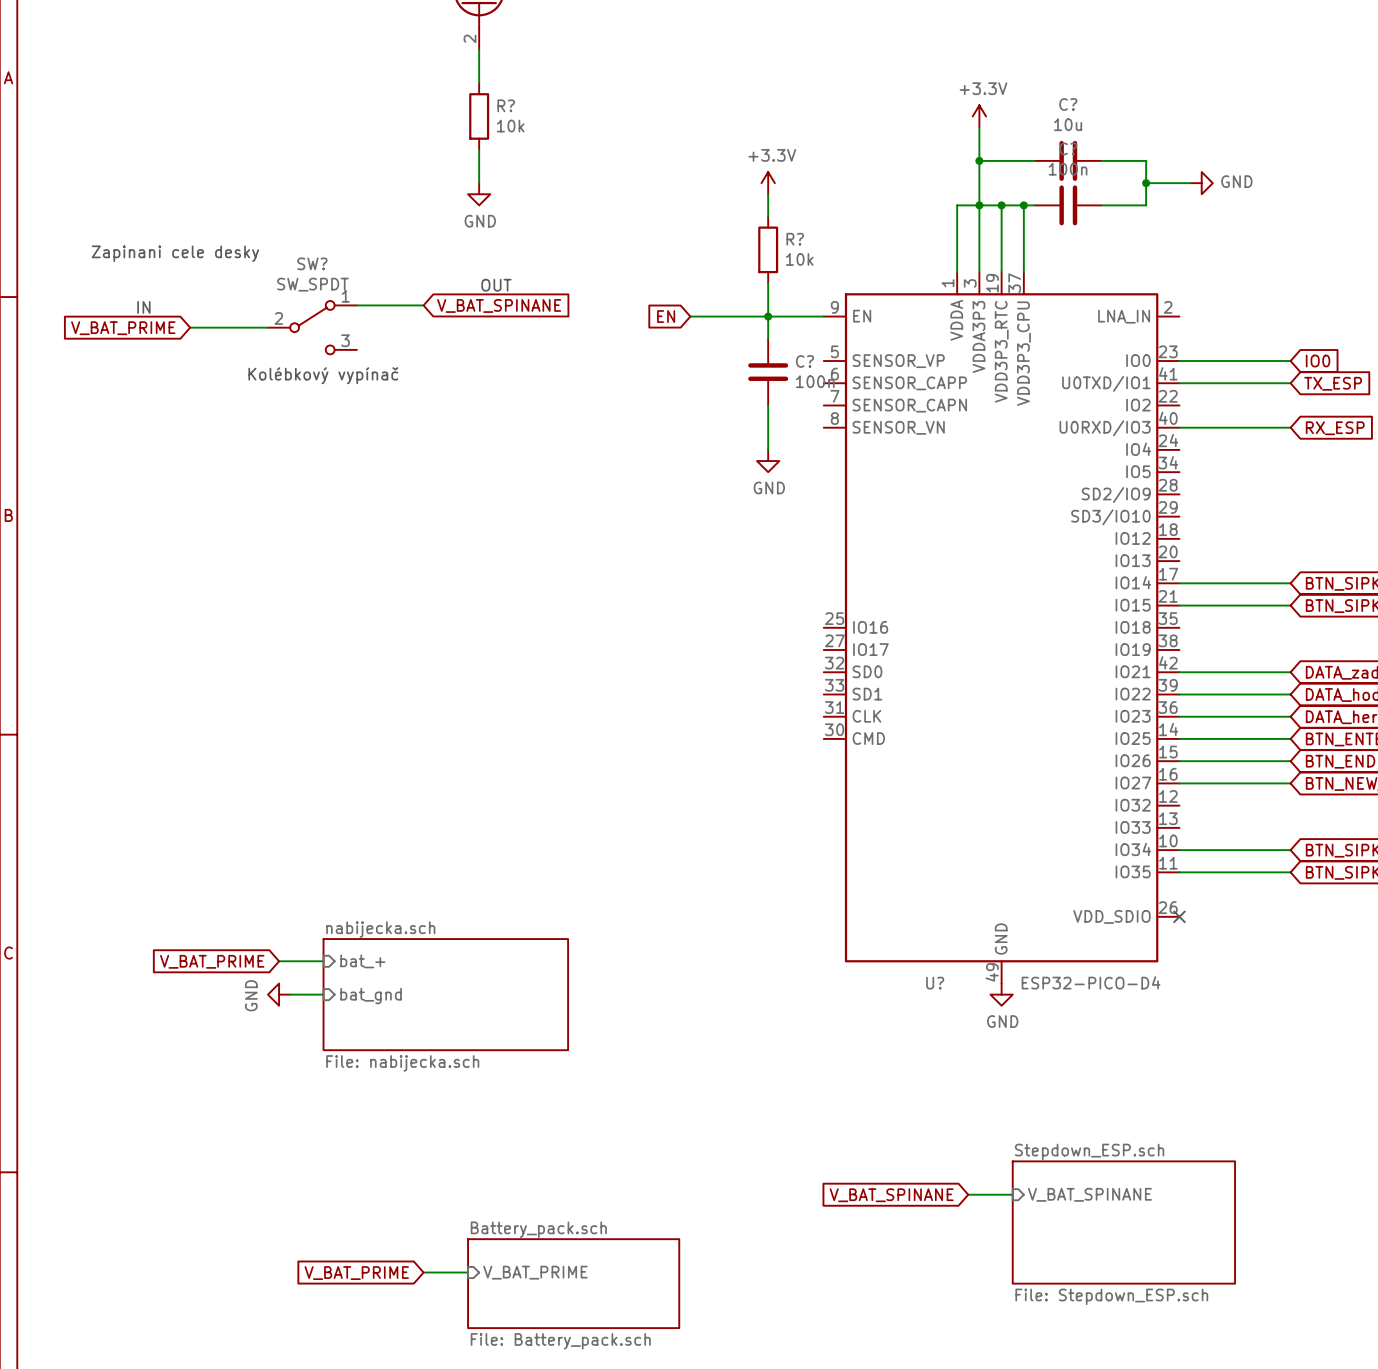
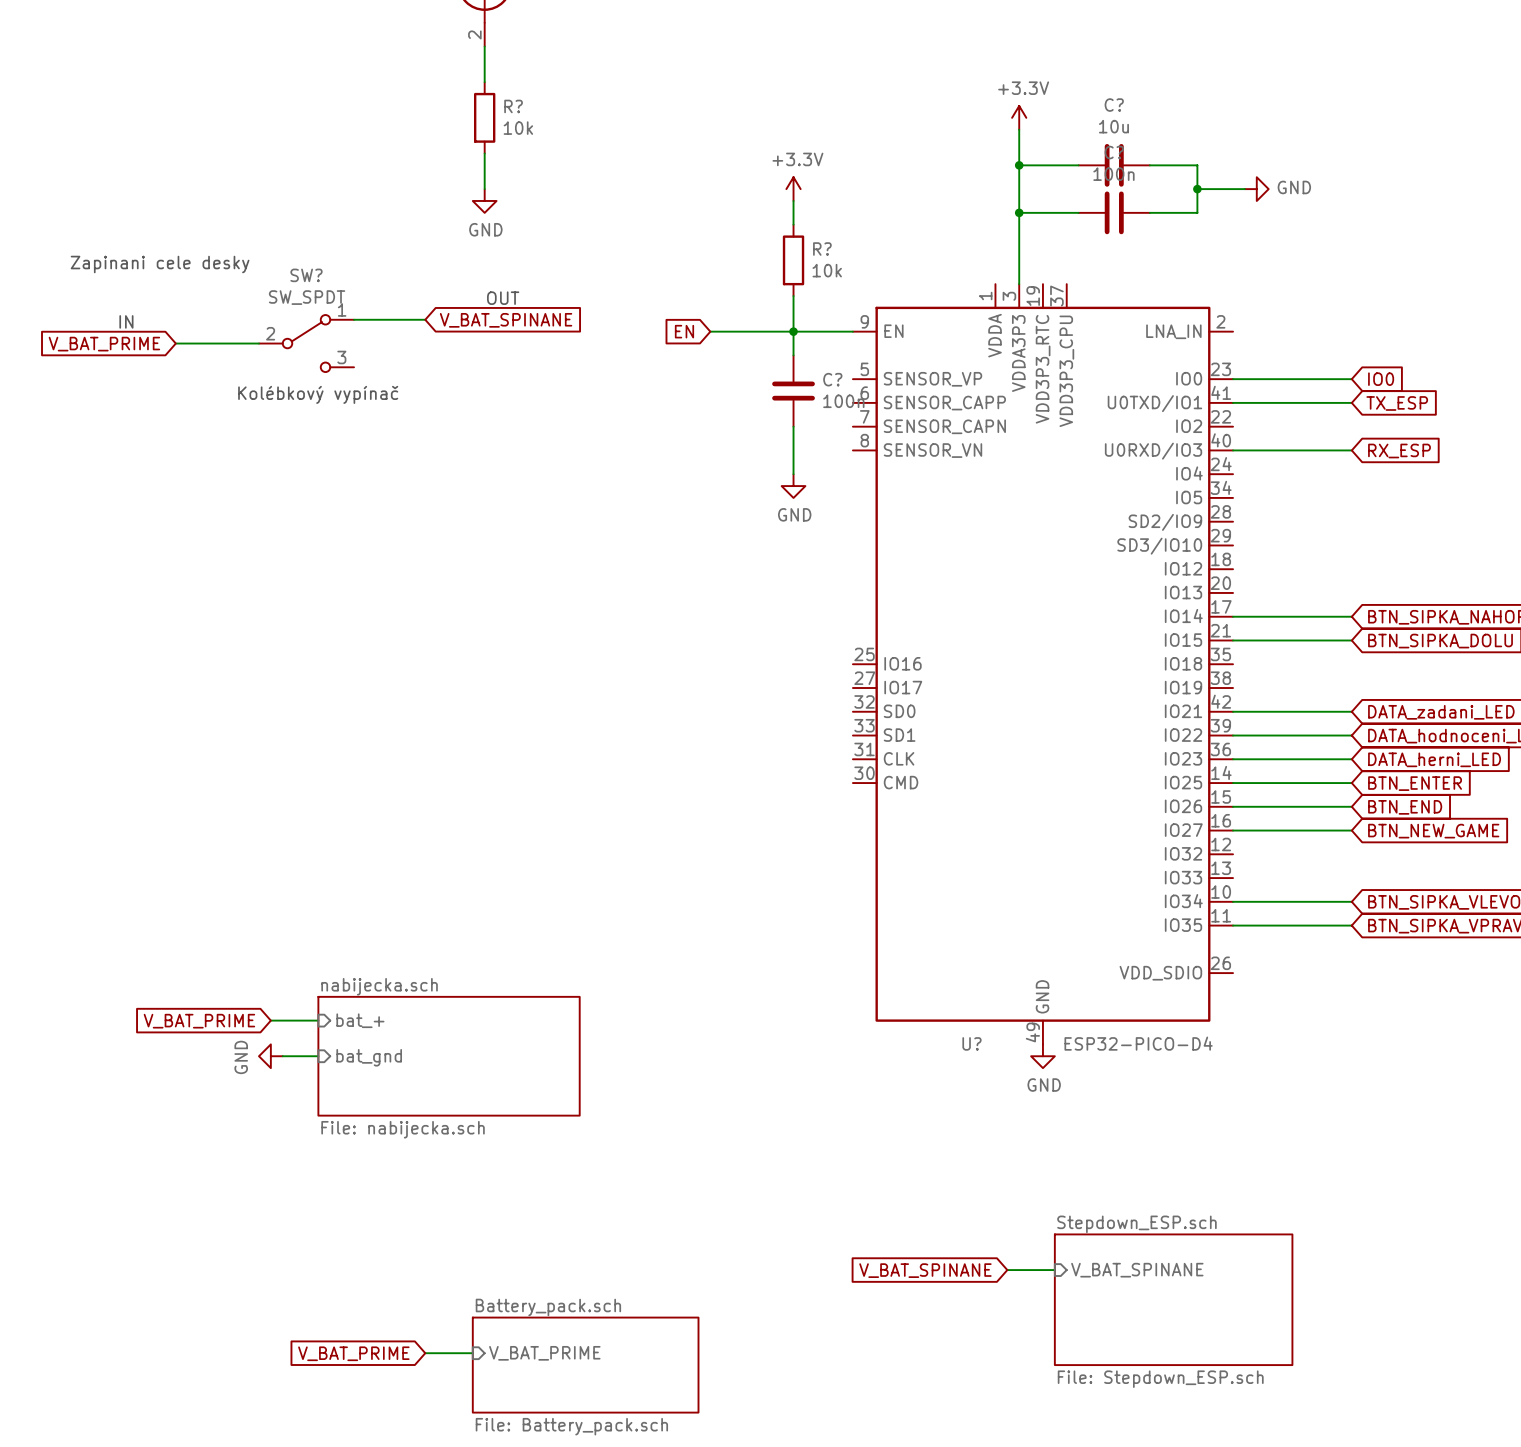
wire: (979, 205) (957, 205) (957, 272) -> none
wire: (1001, 205) (1001, 272) -> none
junction: (1001, 205) -> none
wire: (1023, 205) (1023, 272) -> none
junction: (1023, 205) -> none
no-connect mark: (1179, 916) -> none

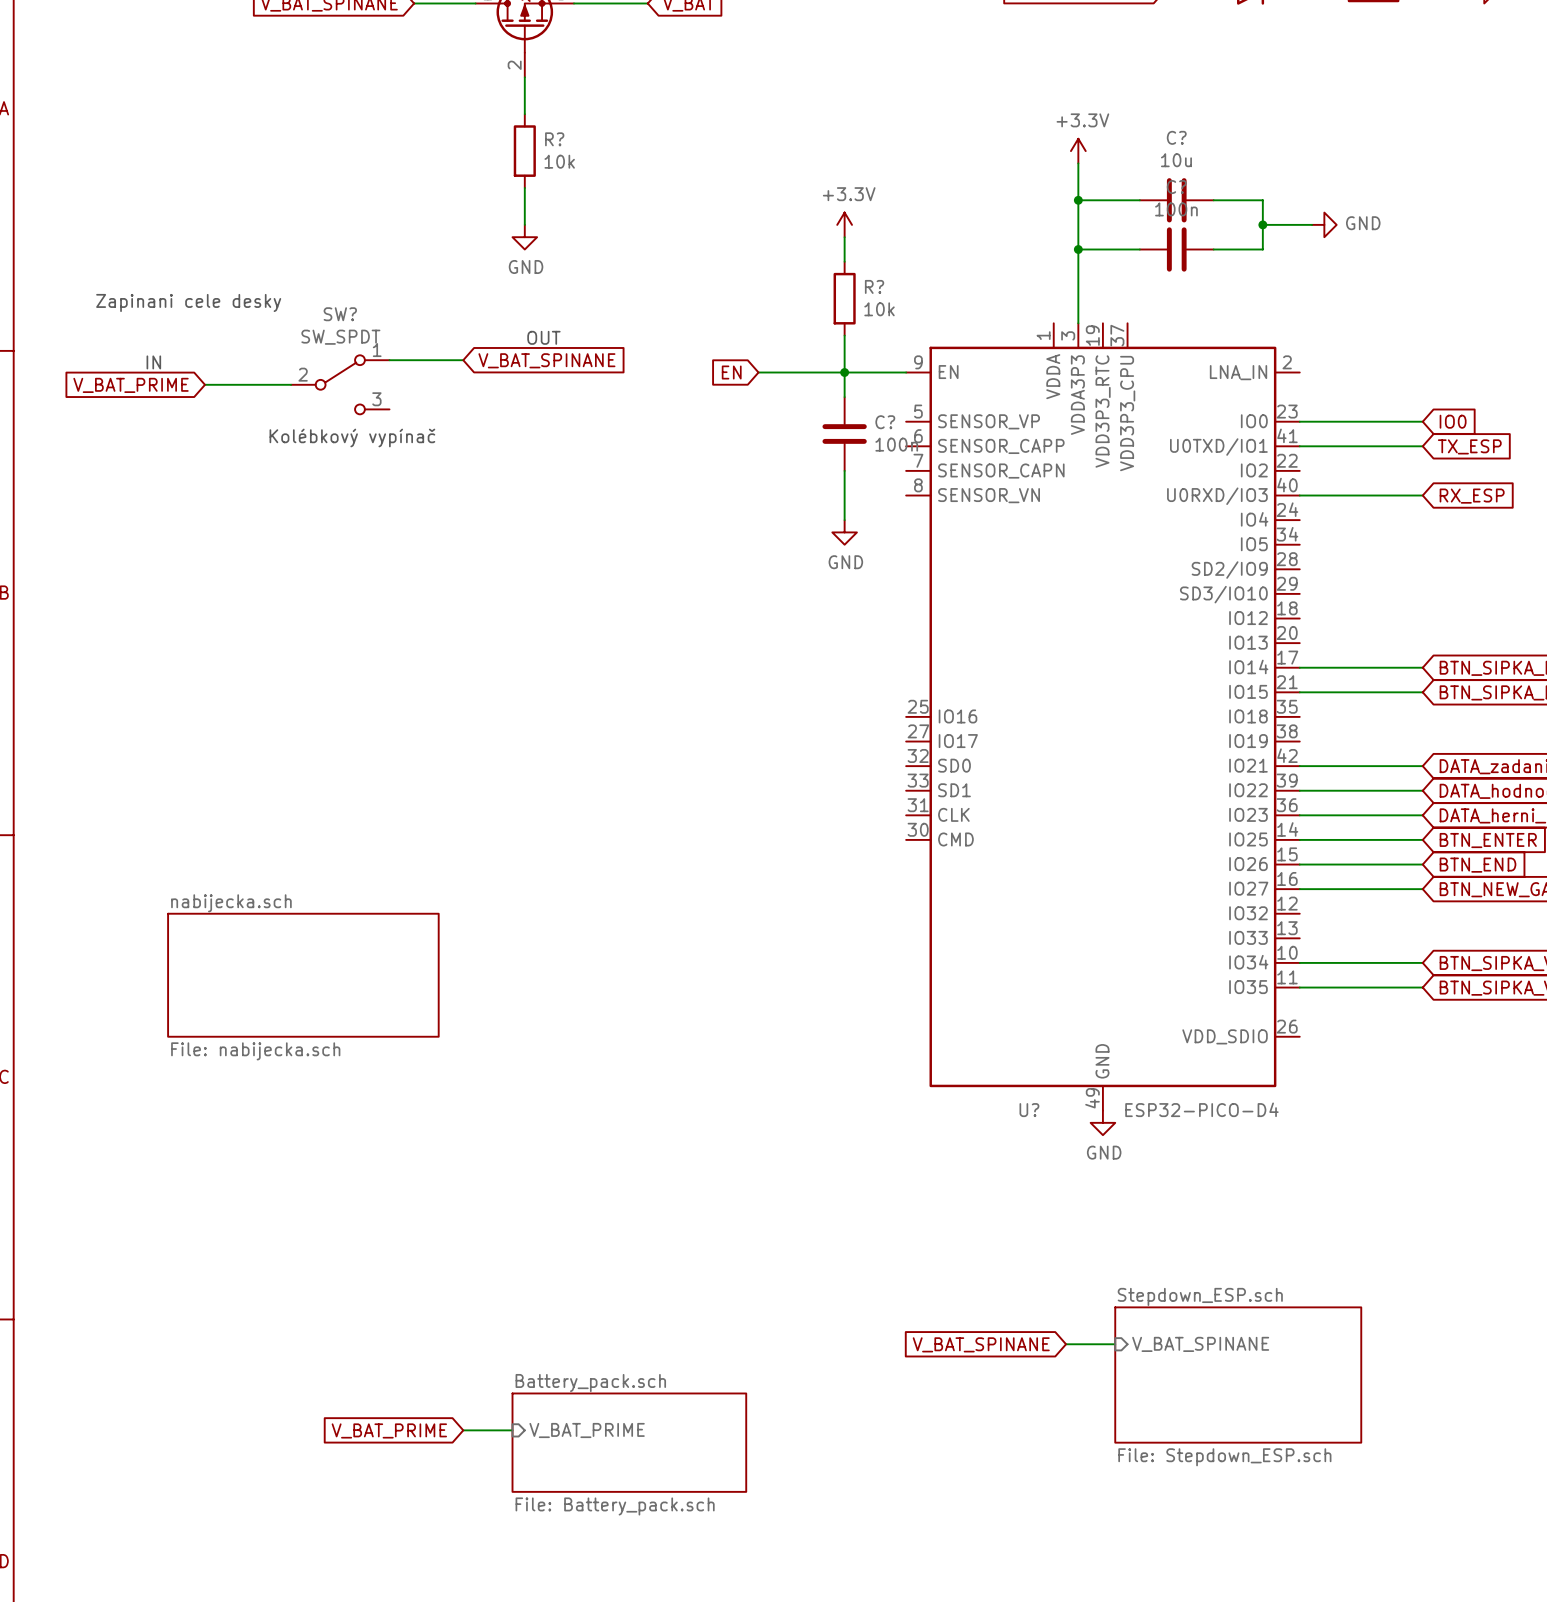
wire: (270, 1020) (318, 1020) -> none
sheet pin: bat_+ (360, 1020) -> none
global label: V_BAT_PRIME (199, 1021) -> none
power symbol: GND (270, 1056) -> none
wire: (282, 1056) (318, 1056) -> none
sheet nabijecka.sch position: (449, 1056) -> (303, 975)
sheet pin: bat_gnd (369, 1057) -> none

